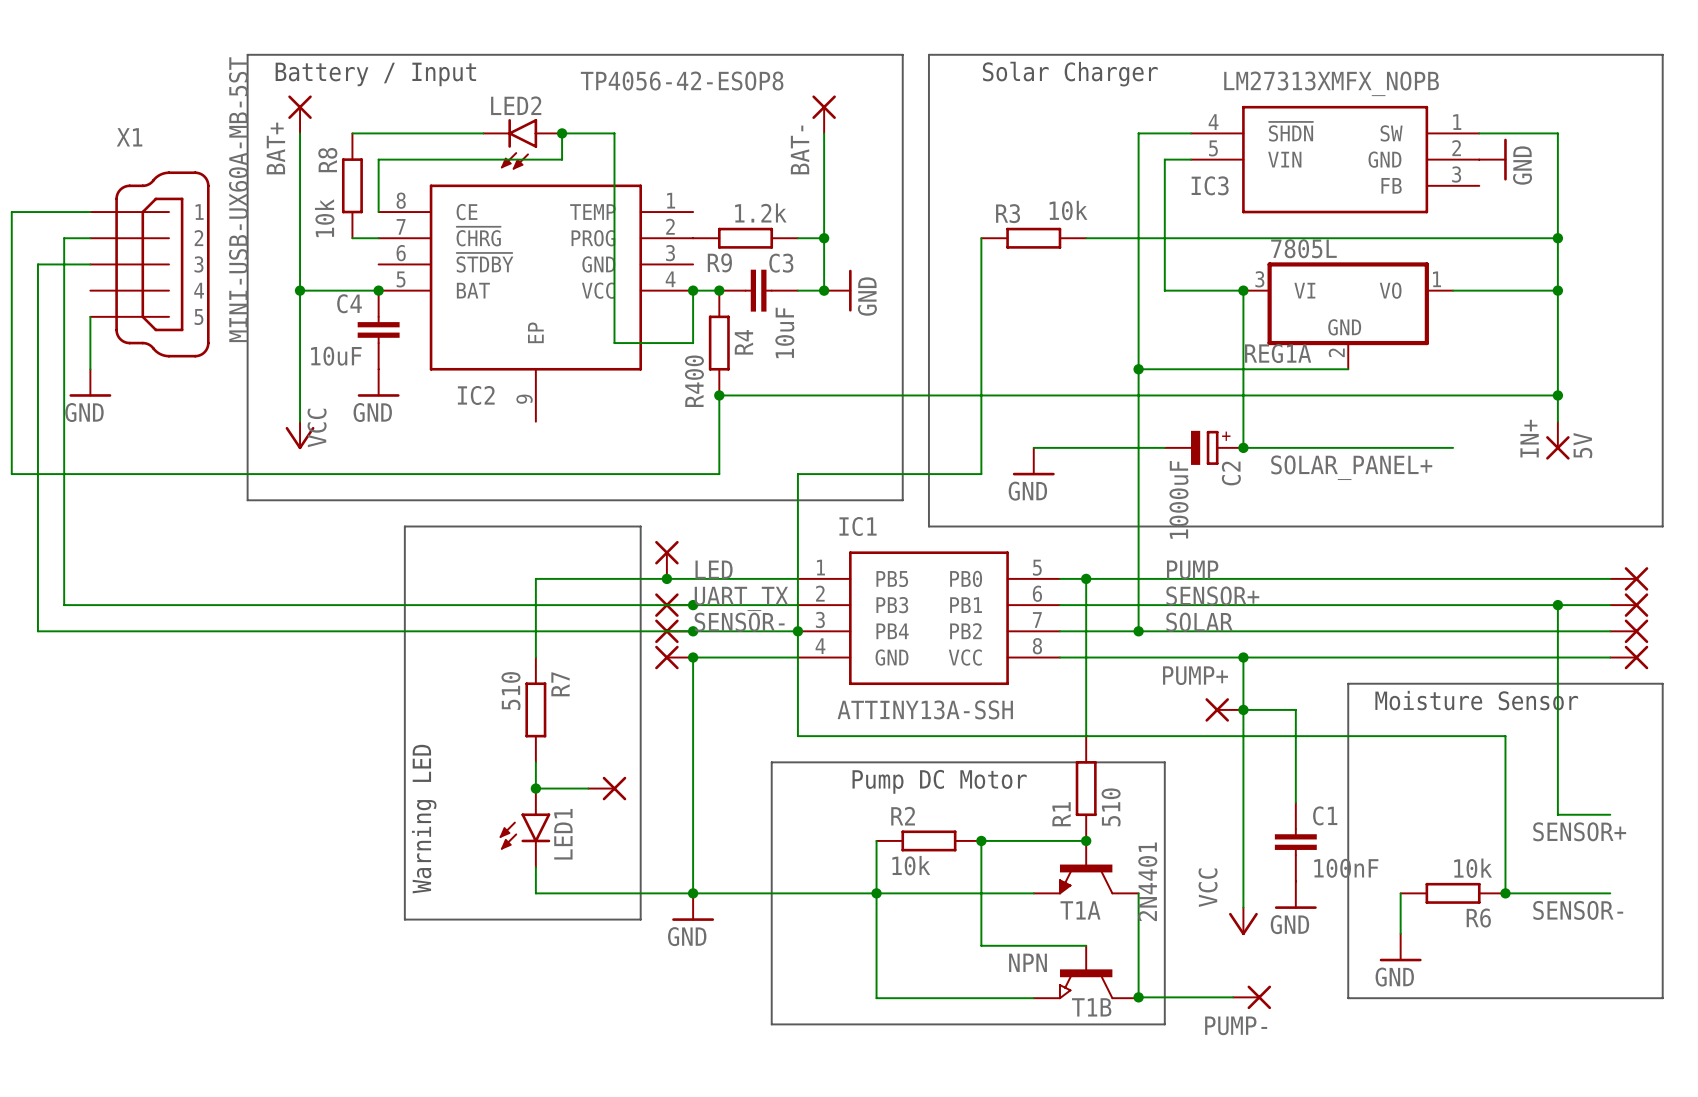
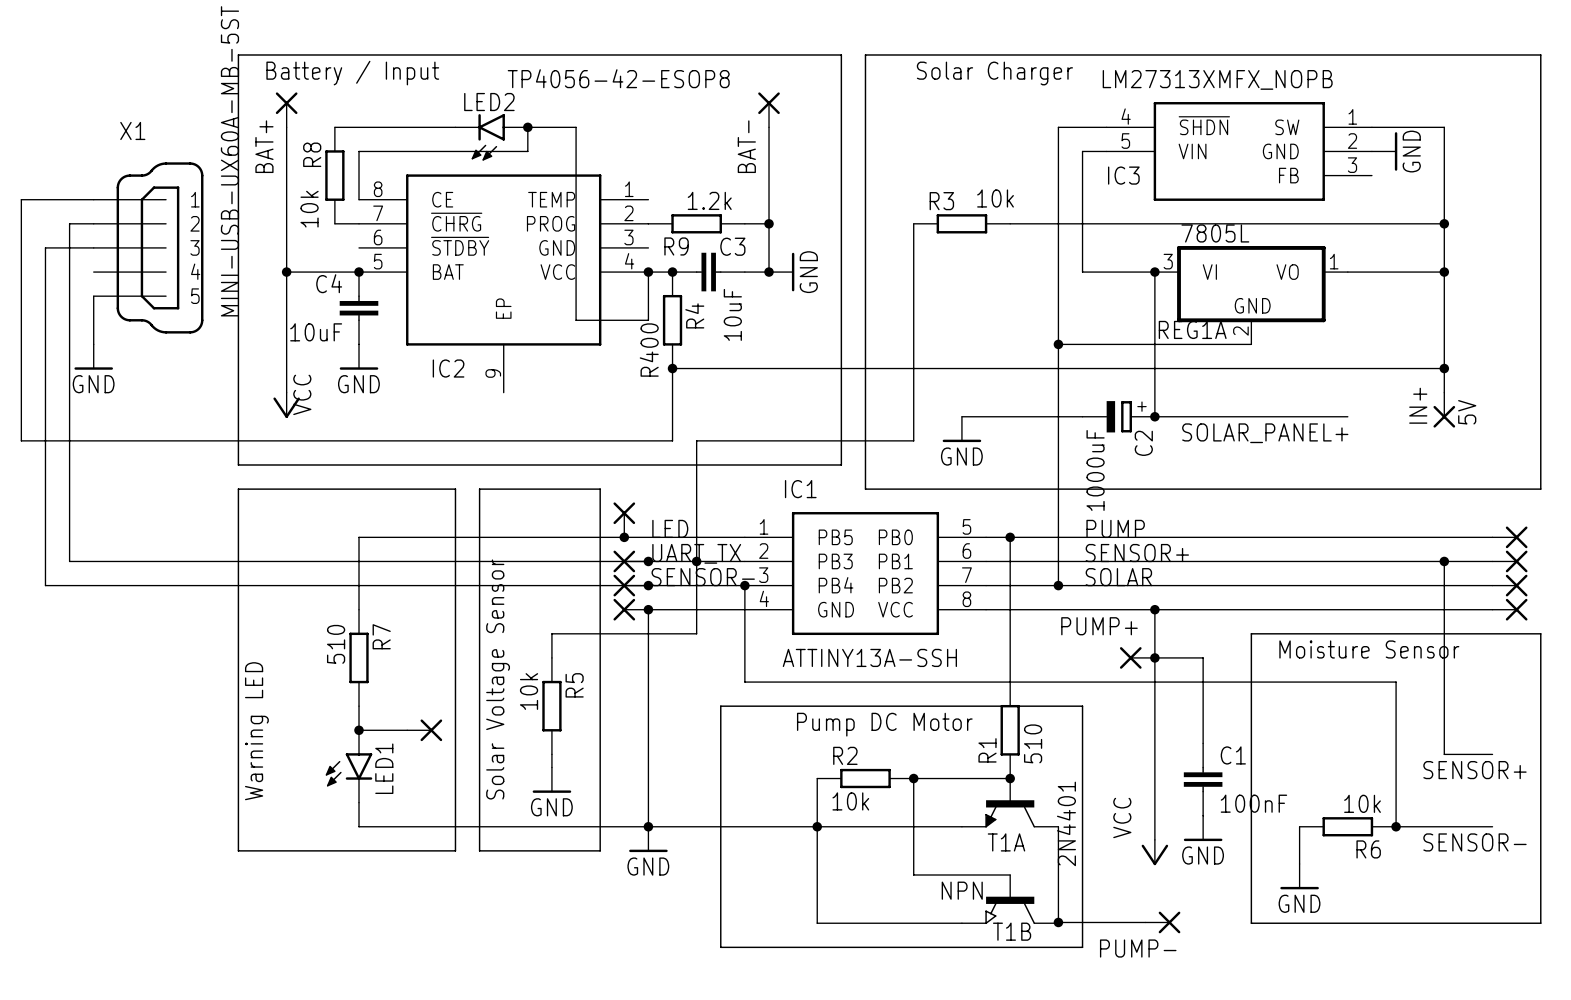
wire: (797, 474) (797, 631) -> (744, 440) (696, 440) (696, 633) (551, 633) (551, 657)
line: (404, 526) (404, 919) -> (383, 489) (238, 489) (238, 850) (383, 850)
line: (483, 526) (509, 526) -> (455, 489) (455, 850)
wire: (535, 578) (535, 657) -> (503, 537) (359, 537) (359, 609)
junction: none -> (696, 561)
R7 position: (535, 709) -> (359, 657)
text: none -> Solar Voltage Sensor (498, 679)
wire: (535, 762) (535, 788) (588, 788) -> (359, 706) (359, 730) (407, 730)
R5: none -> 10k (551, 706)
junction: none -> (359, 730)
junction: (535, 788) -> none
part position: (607, 788) -> (424, 730)
wire: none -> (551, 754) (551, 767)
text position: Warning LED (424, 819) -> Warning LED (256, 731)
LED1 position: (525, 827) -> (348, 766)
power symbol: none -> GND (551, 780)
wire: (535, 867) (535, 893) -> (359, 802) (359, 826) (503, 826)
line: (483, 919) (509, 919) -> (479, 489) (479, 850)

